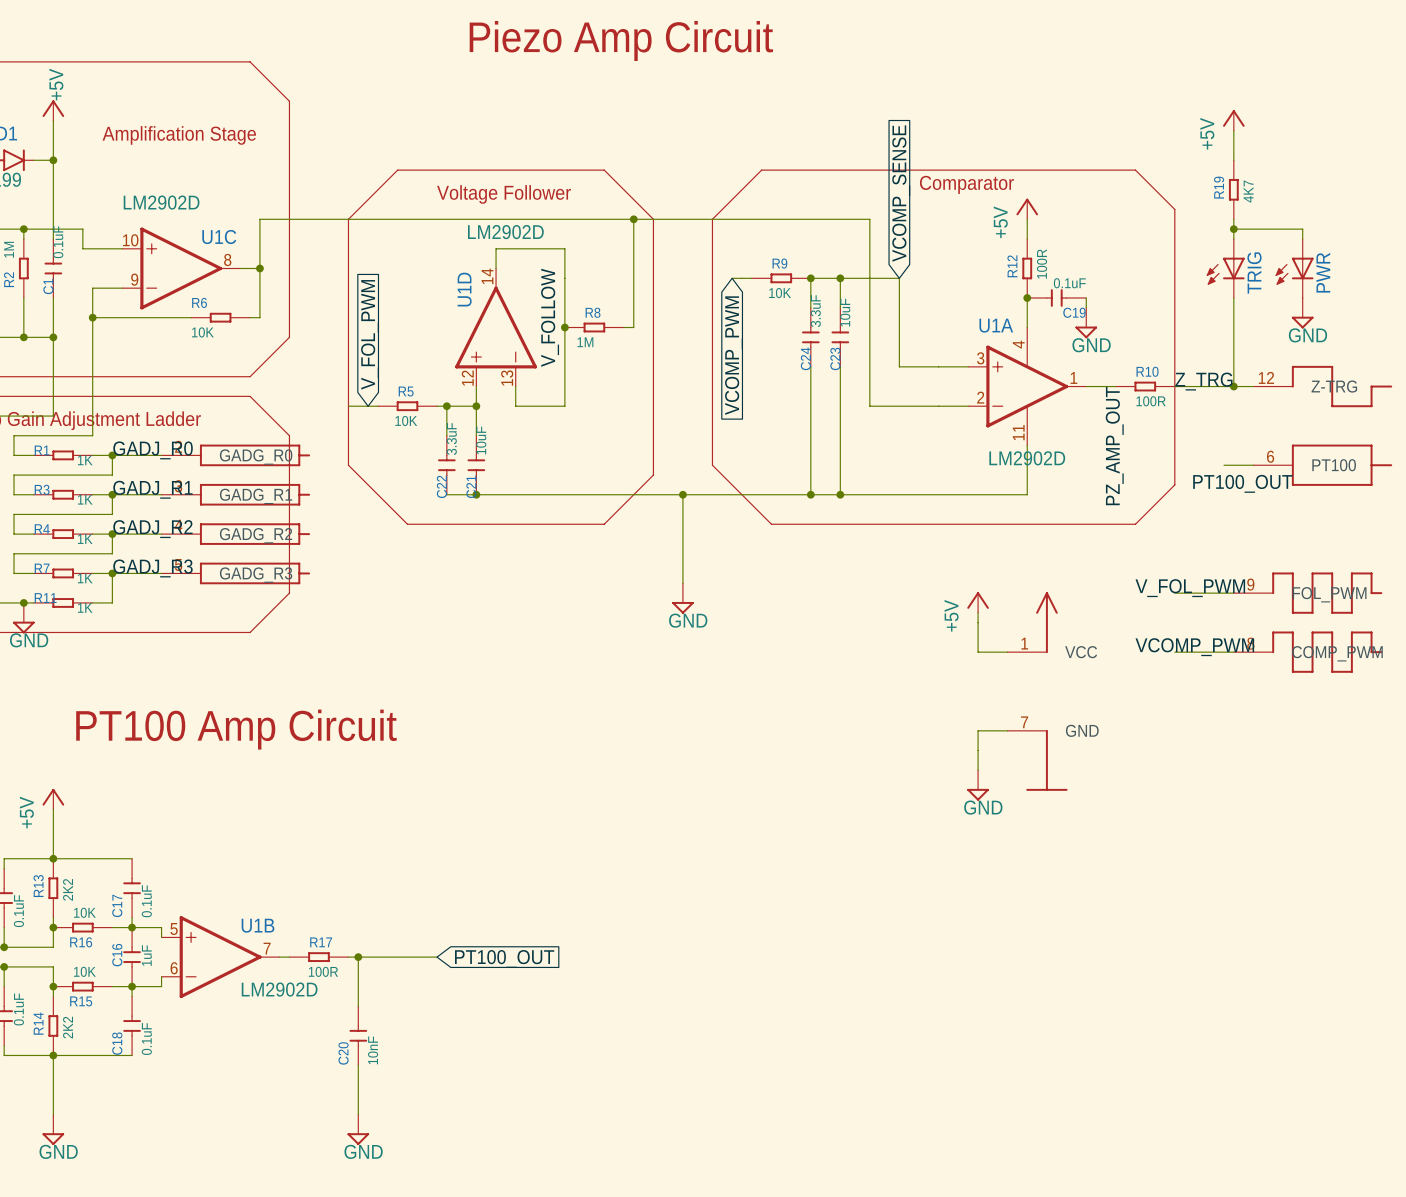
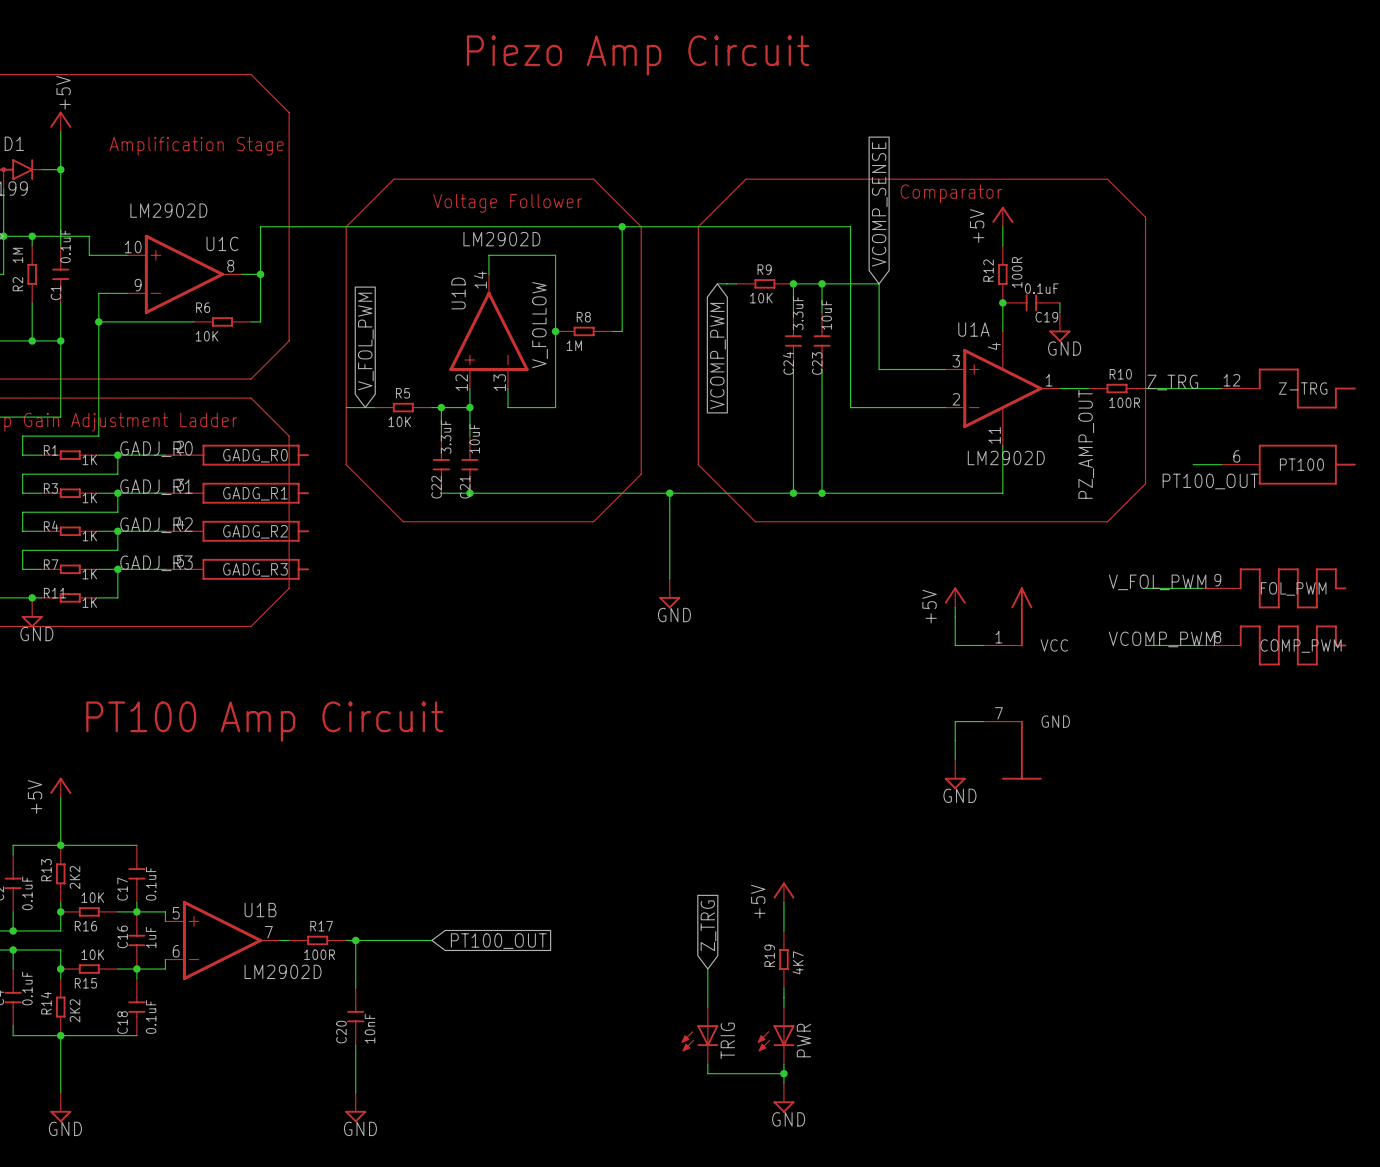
power symbol: +5V (1233, 120) -> none
wire: (1233, 130) (1233, 160) -> none
R19 position: (1233, 189) -> (783, 959)
wire: (1233, 219) (1233, 238) -> none
wire: (1233, 229) (1302, 229) (1302, 238) -> none
junction: (1233, 229) -> none
TRIG: (1225, 268) -> none
PWR: (1294, 268) -> none
wire: (1233, 298) (1233, 386) -> none
power symbol: GND (1302, 313) -> none
junction: (1233, 386) -> none
power symbol: none -> +5V (783, 892)
wire: none -> (783, 902) (783, 930)
global label: none -> Z_TRG (708, 925)
wire: none -> (707, 969) (707, 1007)
wire: none -> (783, 988) (783, 1007)
TRIG: none -> (699, 1035)
PWR: none -> (776, 1035)
wire: none -> (707, 1064) (707, 1073) (783, 1073)
wire: none -> (783, 1064) (783, 1083)
junction: none -> (783, 1073)
power symbol: none -> GND (783, 1097)

